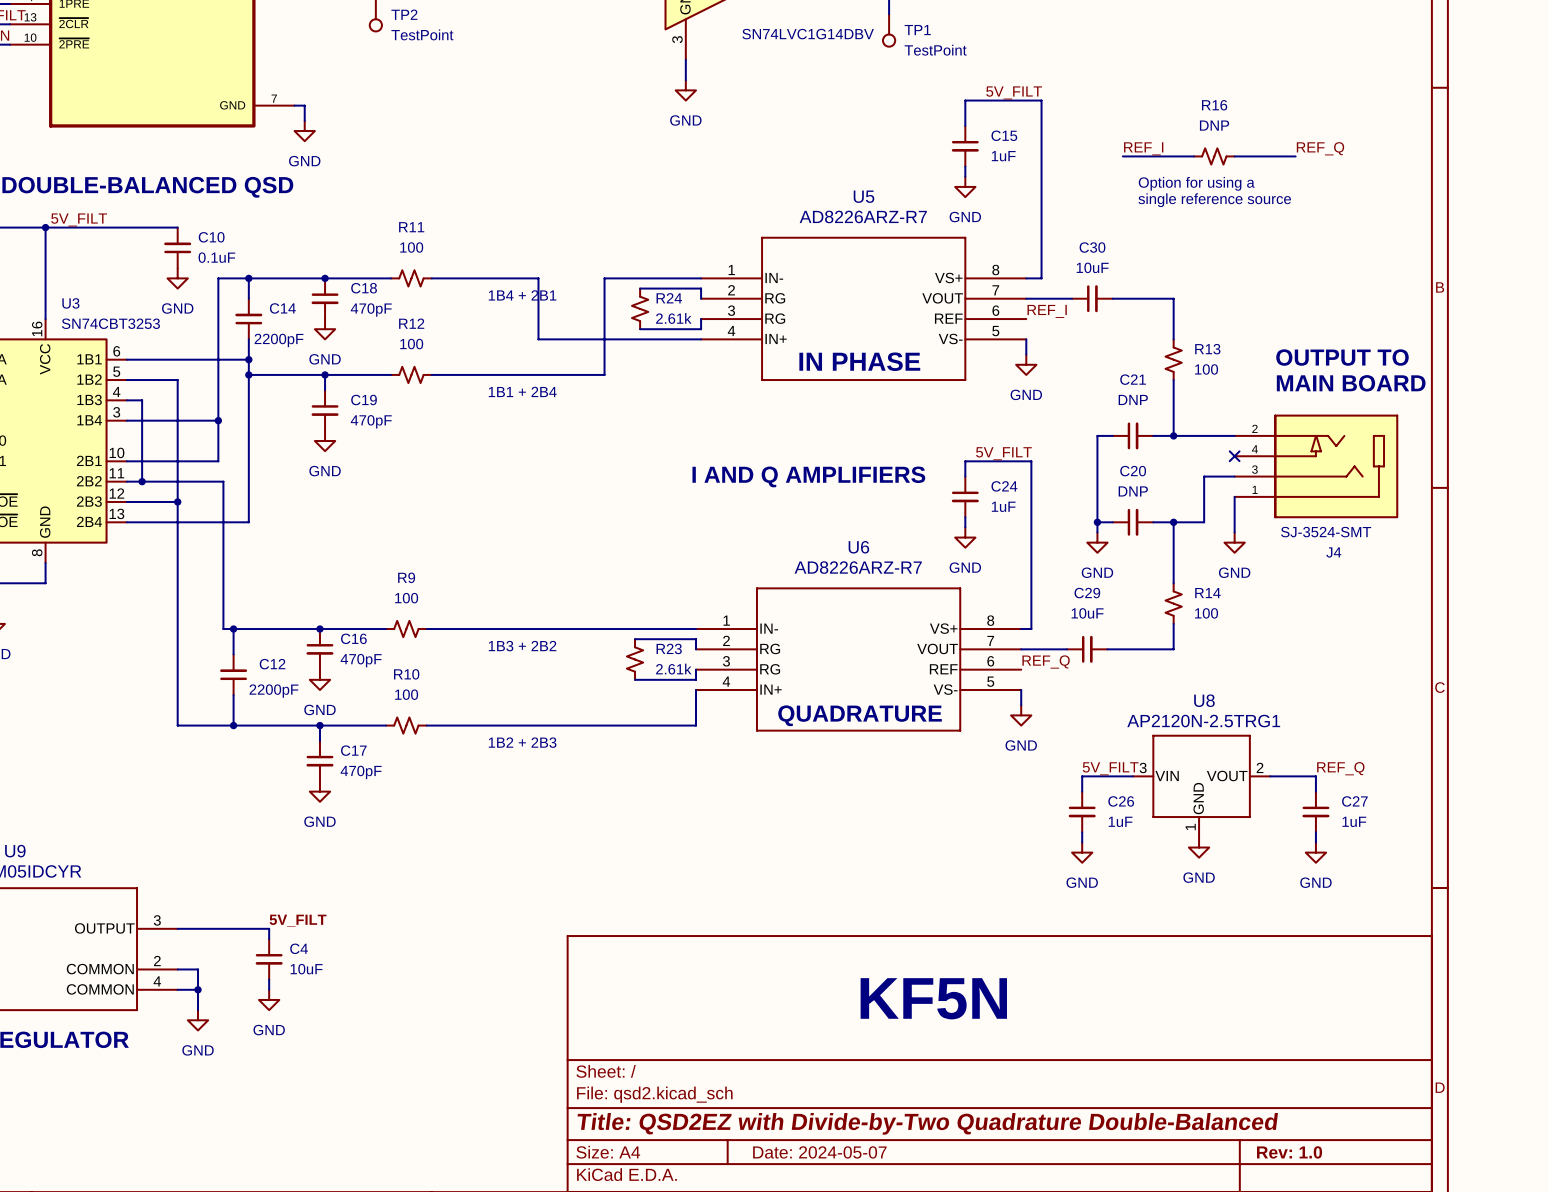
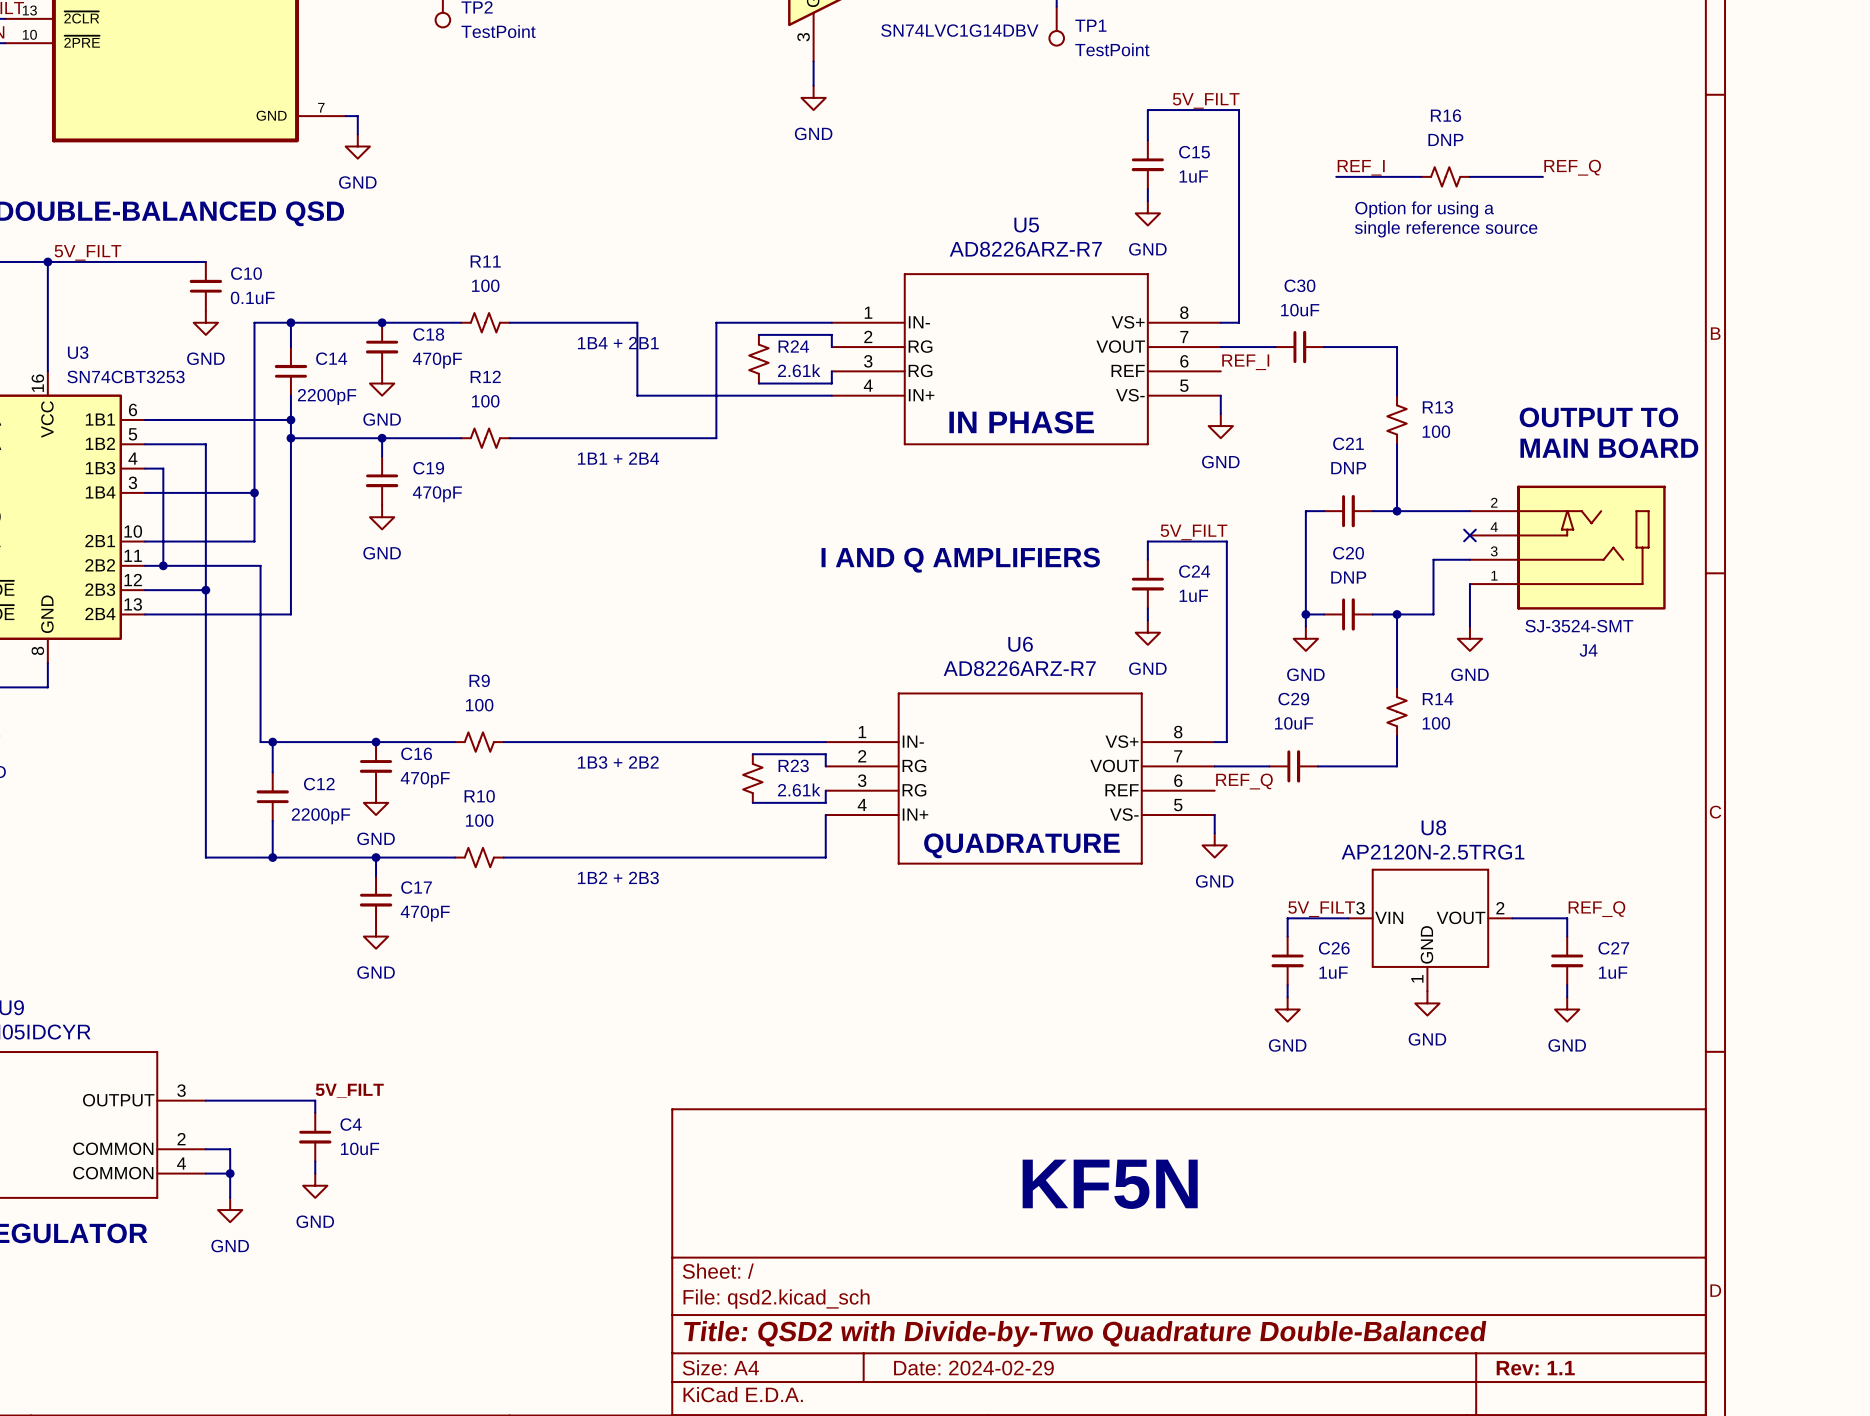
title block: Title: QSD2EZ with Divide-by-Two Quadrature Double-Balanced (927, 1123) -> Title: QSD2 with Divide-by-Two Quadrature Double-Balanced (1085, 1333)
title block: Date: 2024-05-07 (819, 1152) -> Date: 2024-02-29 (973, 1368)
title block: Rev: 1.0 (1289, 1152) -> Rev: 1.1 (1535, 1368)

